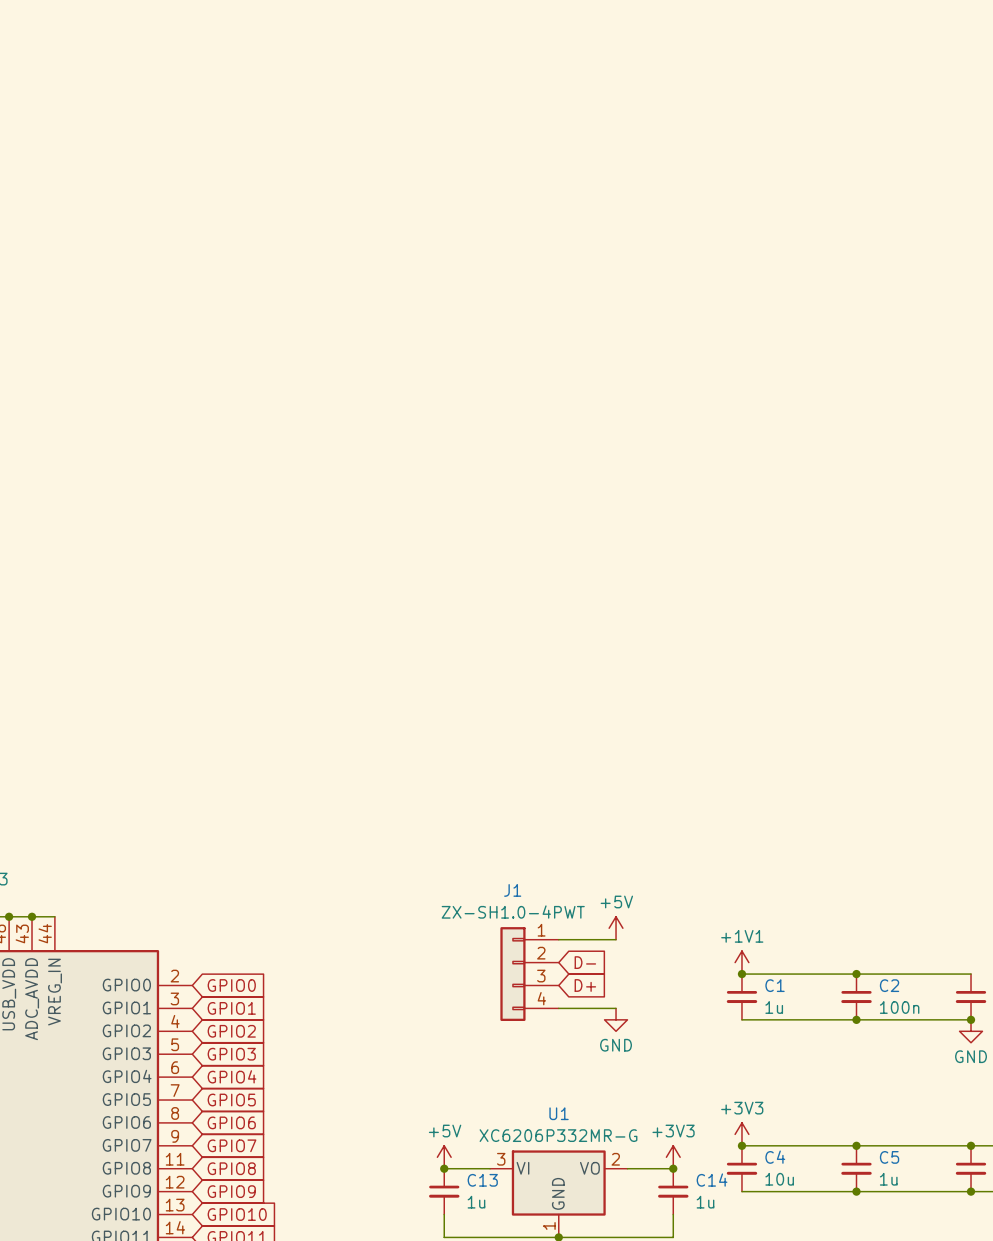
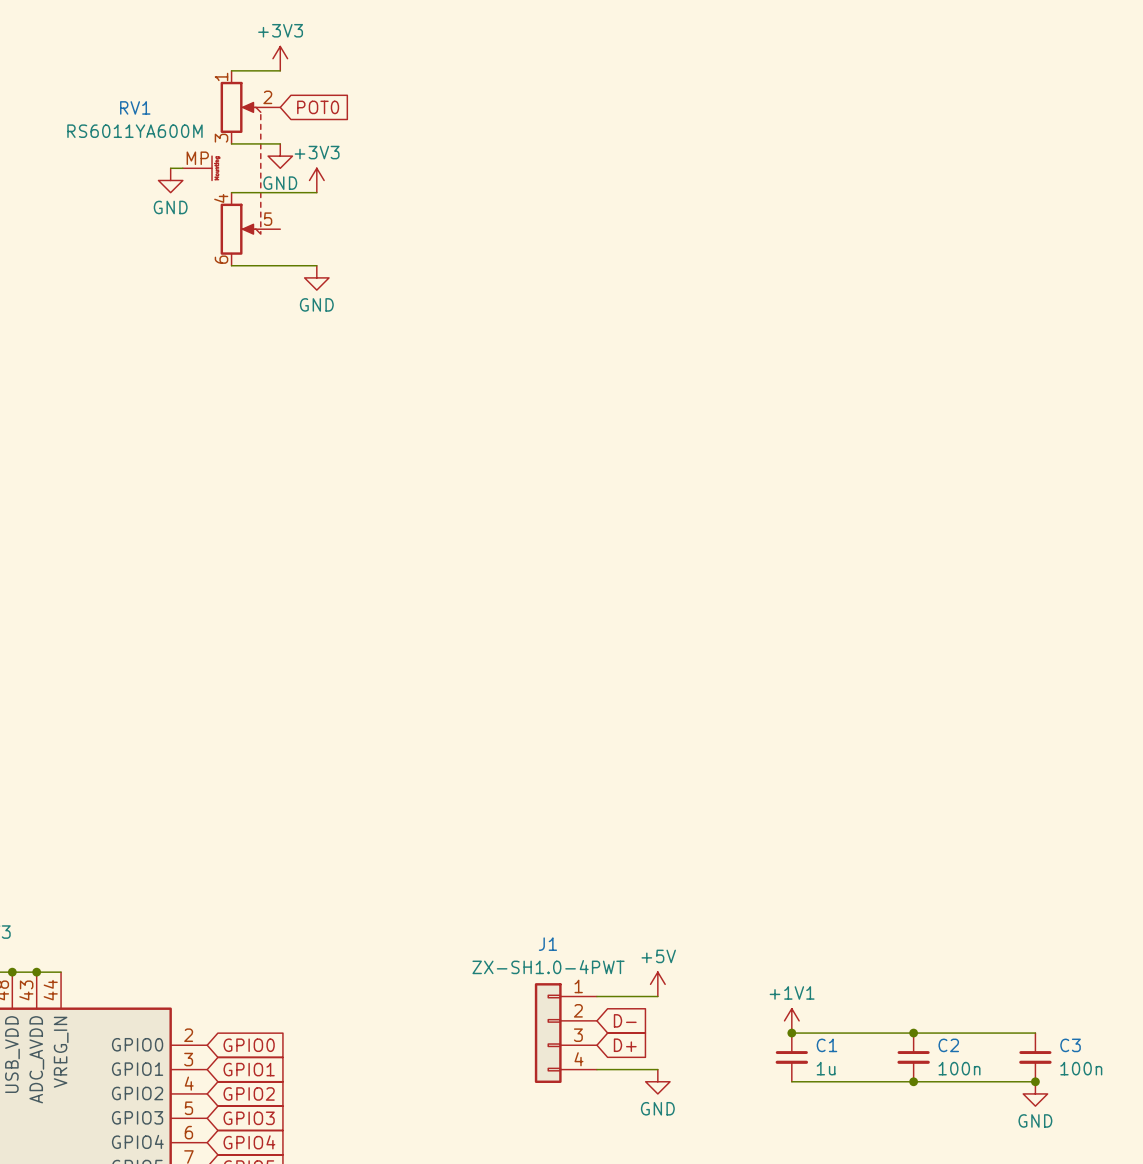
power symbol: none -> +3V3 (280, 58)
wire: none -> (231, 70) (280, 70)
global label: none -> POT0 (318, 107)
wire: none -> (231, 143) (280, 143)
power symbol: none -> GND (280, 156)
wire: none -> (170, 168) (182, 168)
RV1: none -> RS6011YA600M (231, 168)
power symbol: none -> GND (170, 180)
power symbol: none -> +3V3 (316, 180)
wire: none -> (231, 192) (316, 192)
wire: none -> (231, 265) (316, 265)
power symbol: none -> GND (316, 277)

